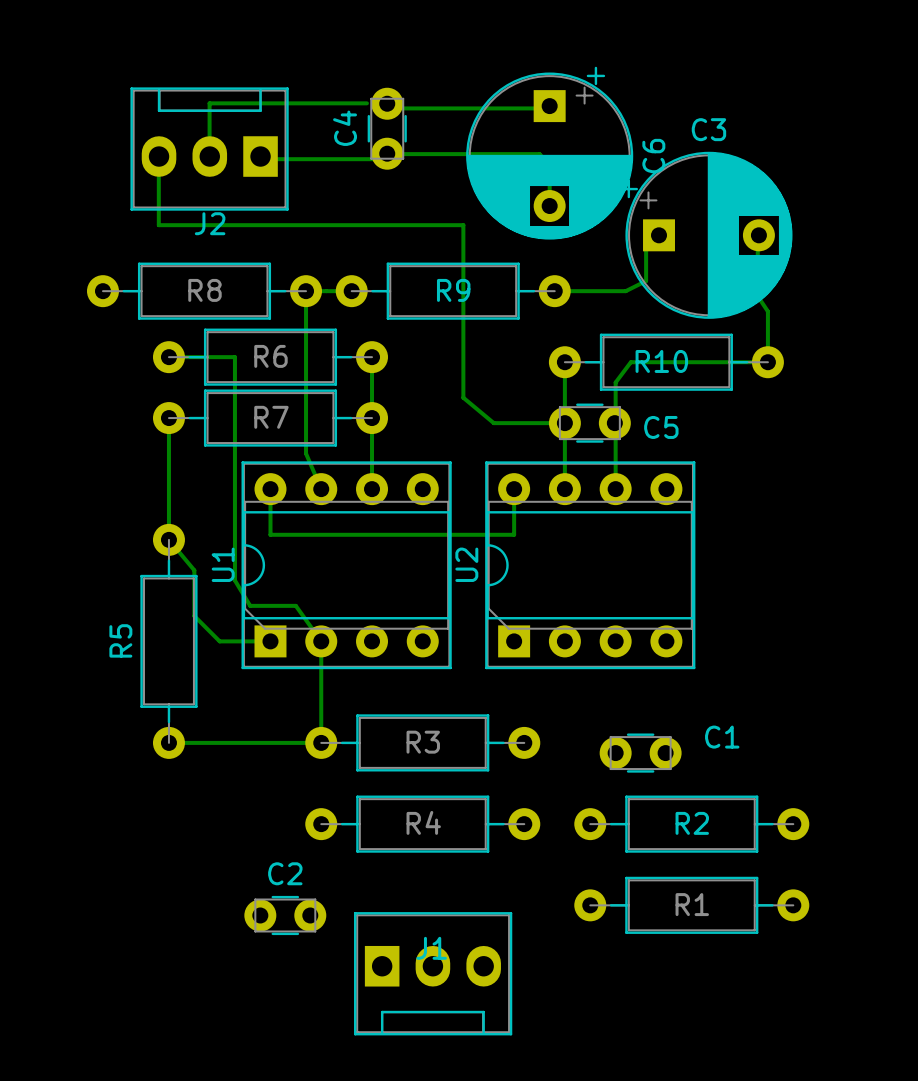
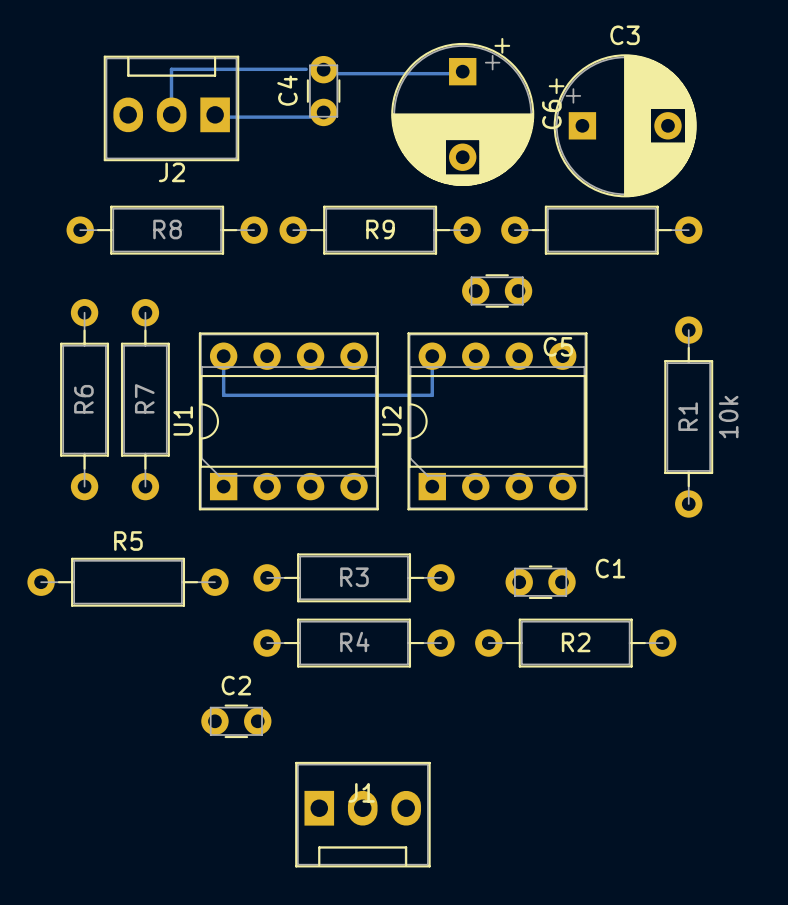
bottom track: (387, 154) (539, 154) (549, 164) (549, 204) -> none
bottom track: (158, 159) (158, 225) (463, 225) (463, 397) (493, 423) (564, 423) -> none
bottom track: (656, 235) (646, 250) (646, 281) (625, 291) (554, 291) -> none
C3 position: (706, 235) -> (622, 125)
bottom track: (757, 235) (757, 296) (767, 311) (767, 362) (630, 362) (615, 382) (615, 489) -> none
bottom track: (351, 291) (306, 291) (306, 453) (321, 489) -> none
part: none -> (601, 230)
bottom track: (168, 357) (234, 357) (234, 580) (250, 605) (295, 605) (321, 641) (321, 742) (168, 742) -> none
R6 rotation: 0° (270, 357) -> 90° clockwise (84, 399)
R6 position: (270, 357) -> (84, 399)
bottom track: (372, 357) (372, 489) -> none
bottom track: (564, 362) (564, 489) -> none
part: (666, 362) -> none
bottom track: (168, 418) (168, 539) (194, 570) (194, 616) (219, 641) (270, 641) -> none
R7 rotation: 0° (270, 418) -> 90° clockwise (145, 399)
C5 position: (589, 423) -> (497, 290)
bottom track: (270, 489) (270, 534) (514, 534) (514, 494) -> (223, 356) (223, 395) (432, 395) (432, 360)
R1 value: none -> 10k (728, 417)
U1 position: (346, 565) -> (288, 421)
U2 position: (590, 565) -> (497, 421)
R5 rotation: 0° (168, 641) -> 90° clockwise (128, 582)
R3 position: (422, 742) -> (354, 577)
C1 position: (640, 753) -> (540, 582)
R4 position: (422, 824) -> (354, 643)
R2 position: (691, 824) -> (575, 643)
R1 rotation: 0° (691, 905) -> 90° clockwise (688, 417)
R1 position: (691, 905) -> (688, 417)
C2 position: (285, 915) -> (236, 721)

